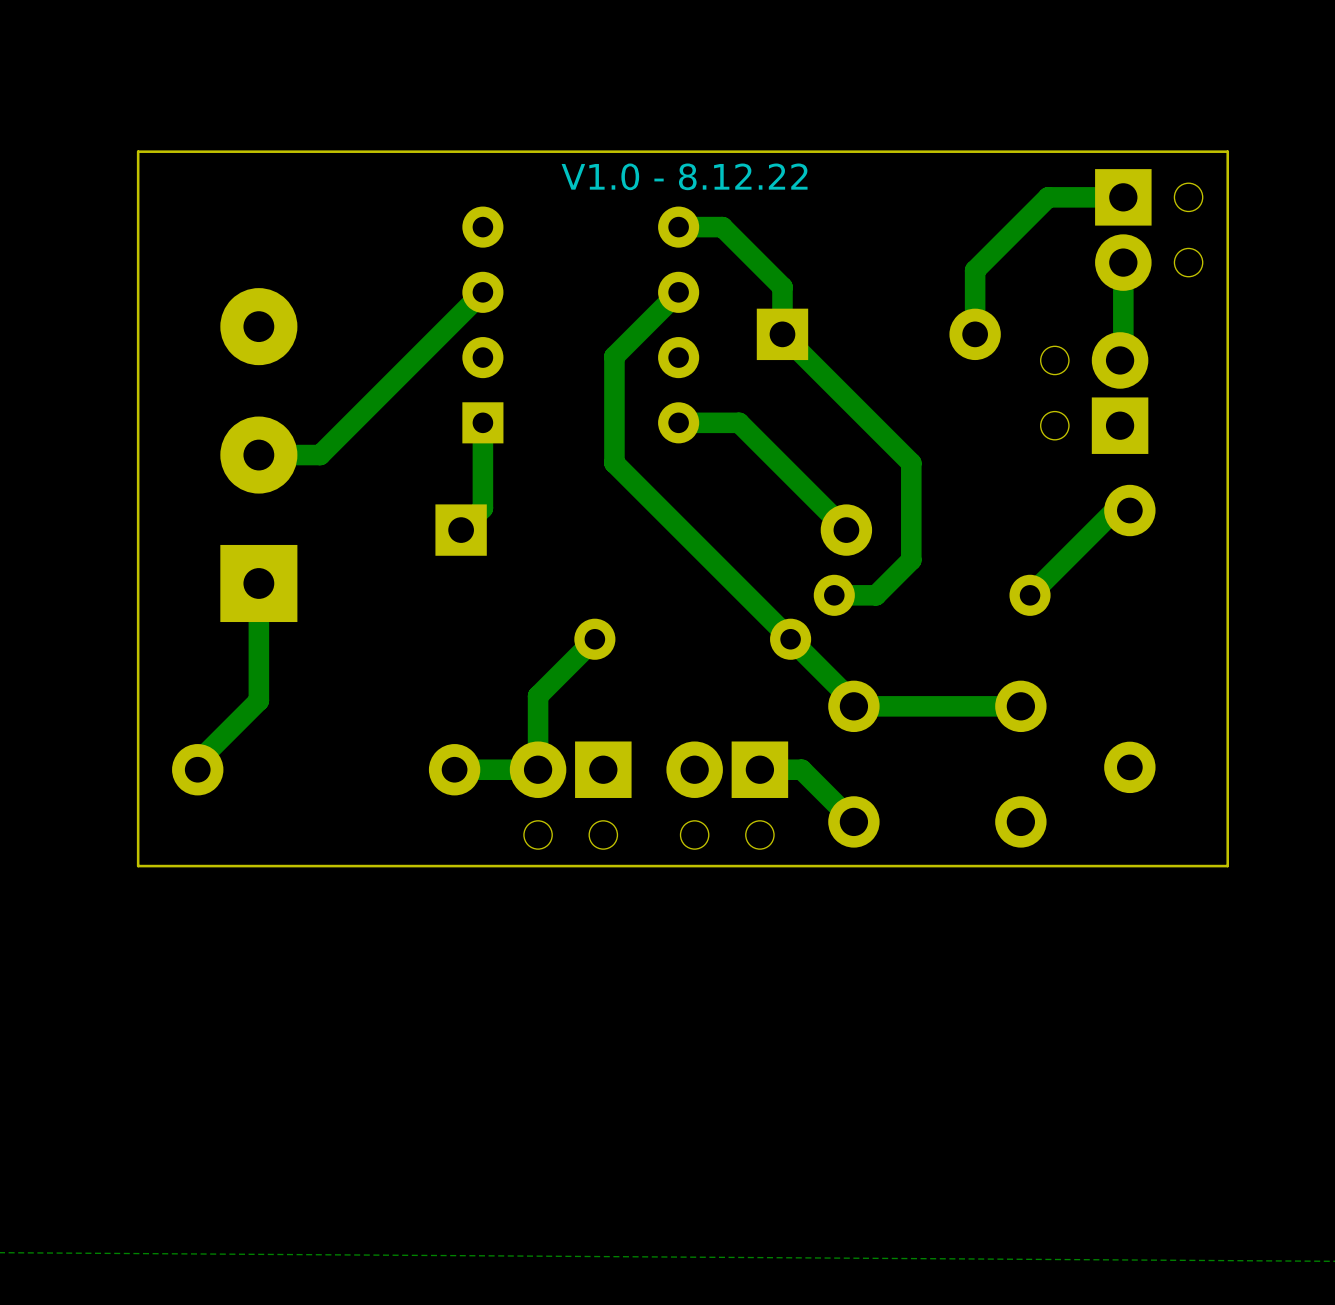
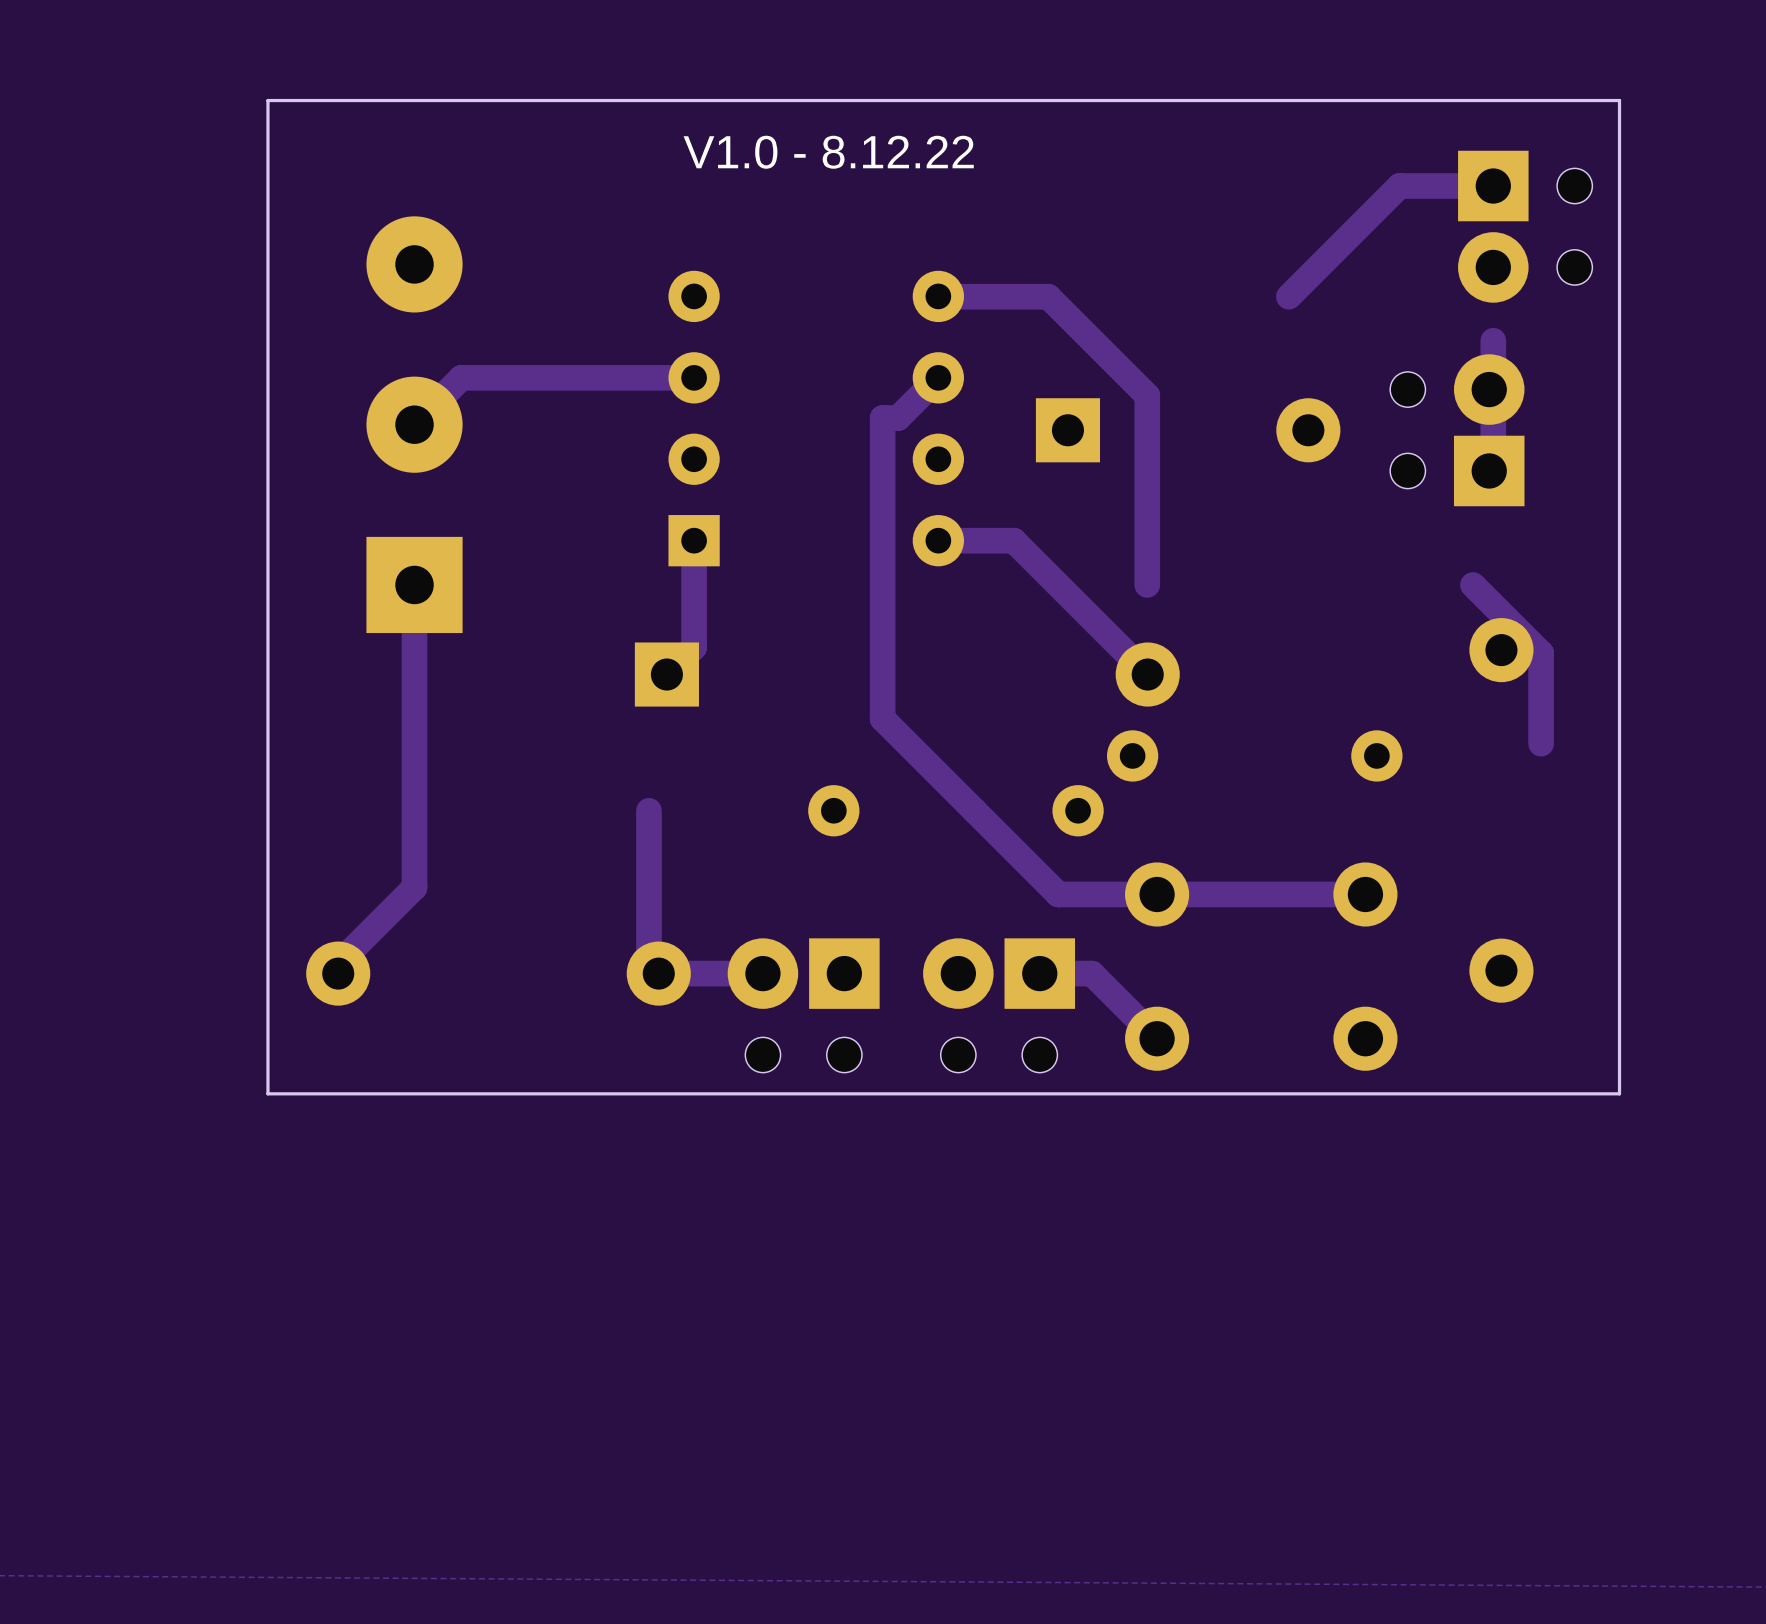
track: none -> (1493, 186) (1399, 186) (1288, 296)
part: none -> (1525, 226)
text position: V1.0 - 8.12.22 (684, 176) -> V1.0 - 8.12.22 (828, 152)
track: (1123, 197) (1048, 197) (975, 270) (975, 334) -> none
track: (678, 227) (722, 227) (782, 287) (782, 334) (911, 463) (911, 560) (876, 595) (834, 595) -> (938, 296) (1048, 296) (1147, 395) (1147, 584)
part: (1148, 229) -> none
track: (482, 292) (320, 455) (258, 455) -> (694, 377) (461, 377) (414, 424)
track: (646, 324) (614, 356) (614, 463) (853, 702) (853, 706) -> (898, 418) (882, 418) (882, 718) (1058, 894) (1157, 894)
part: none -> (1457, 430)
part: (1094, 393) -> none
part position: (258, 455) -> (414, 424)
track: none -> (414, 584) (414, 741)
track: none -> (1472, 584) (1541, 653) (1541, 743)
track: (1129, 510) (1114, 510) (1030, 595) -> none
track: none -> (648, 810) (648, 973)
track: (594, 639) (538, 696) (538, 769) -> none
board edge: (1224, 866) (1227, 866) (1227, 151) (138, 151) (138, 866) (141, 866) -> (1619, 1093) (1619, 100) (267, 100) (267, 1093)

